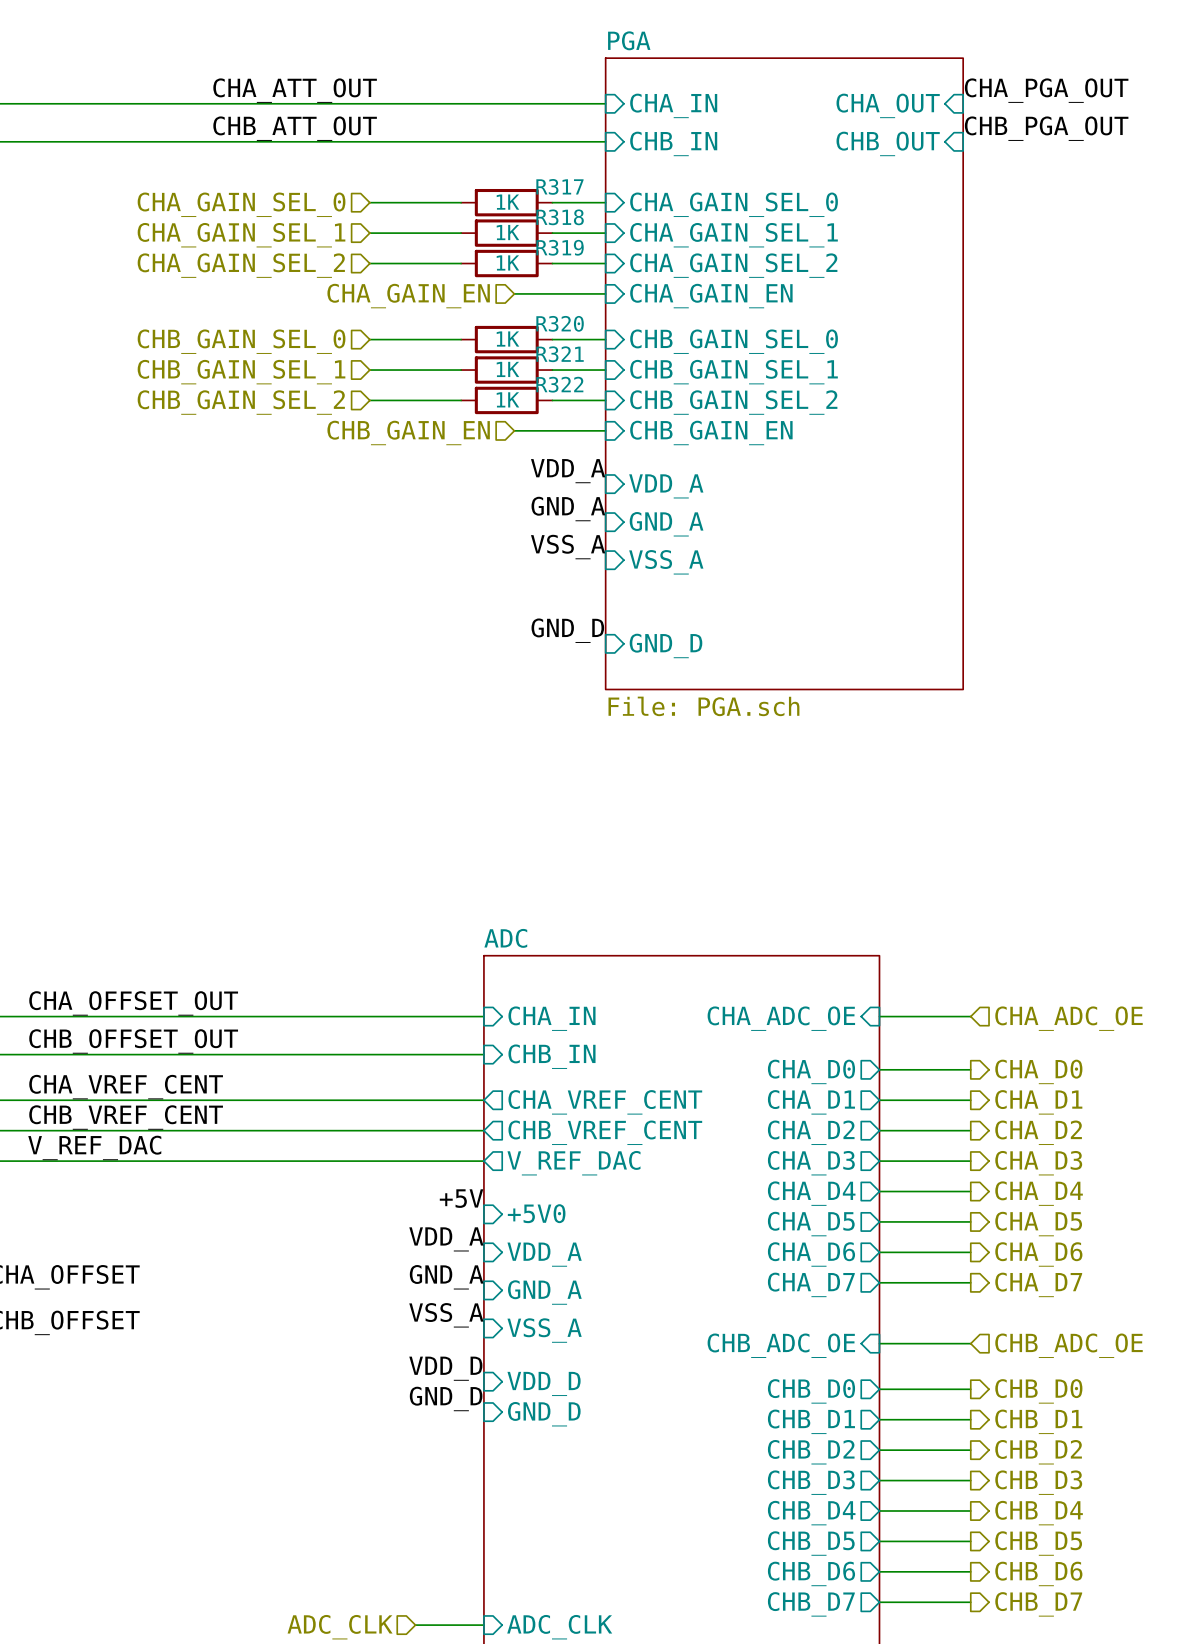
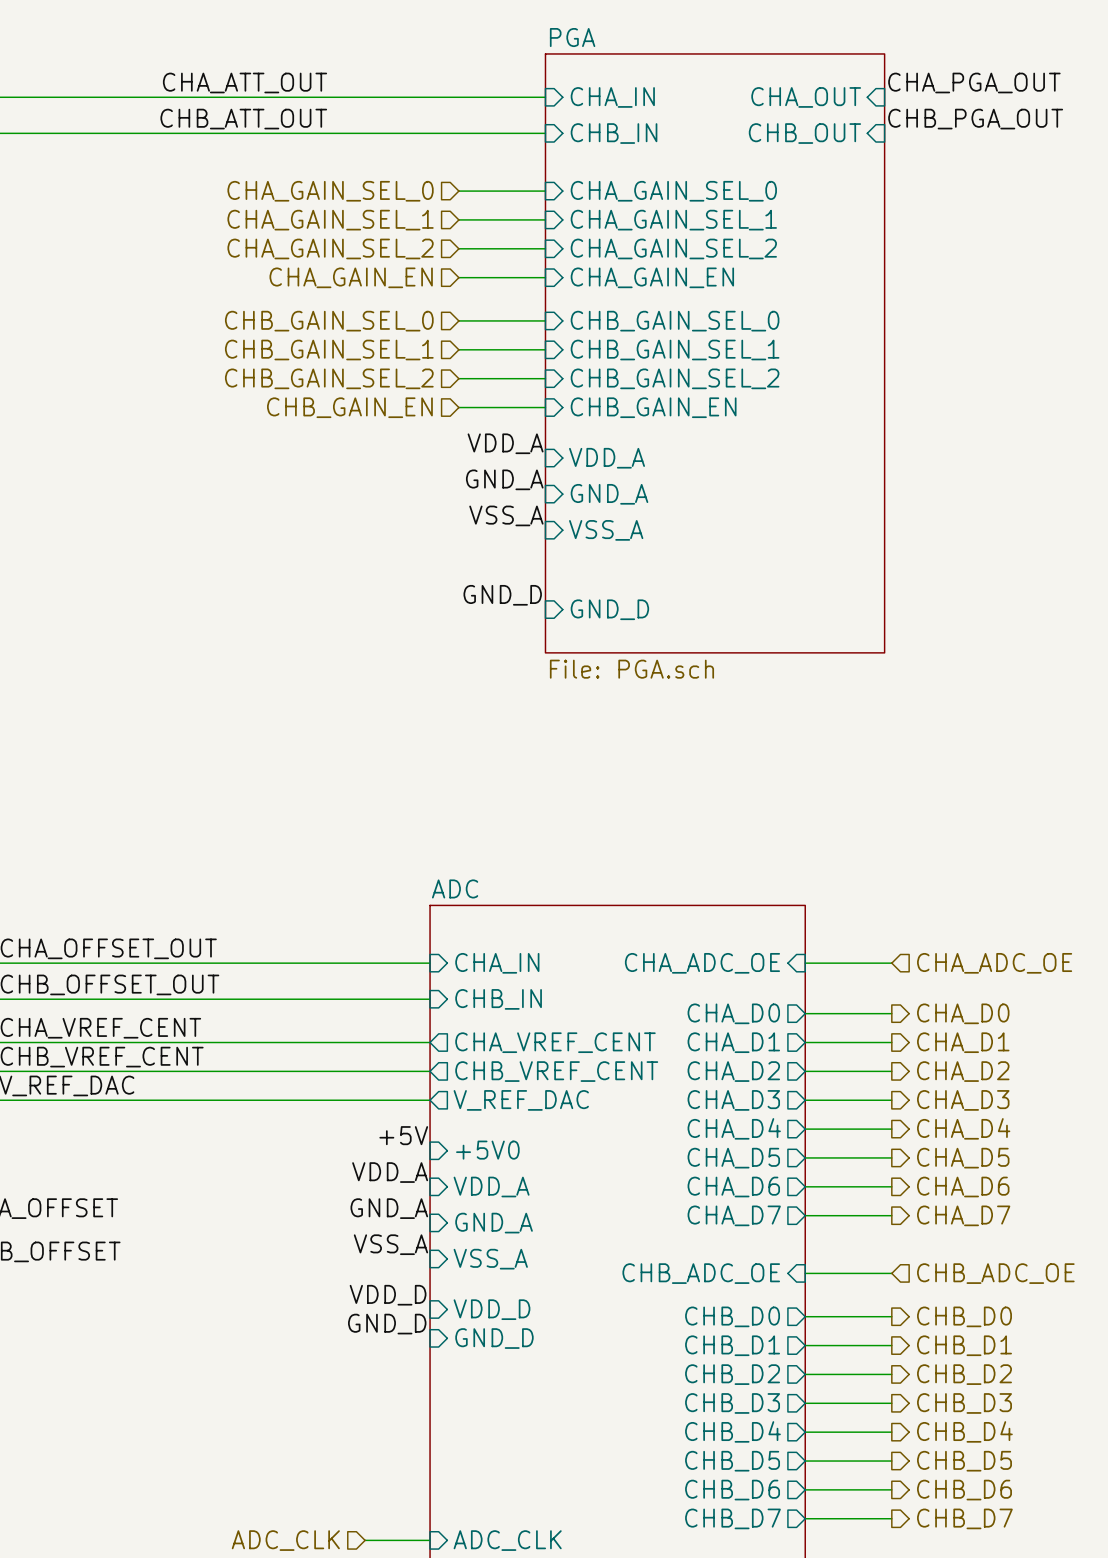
wire: (369, 202) (461, 202) -> none
R317: 1K (506, 202) -> none
wire: none -> (458, 191) (494, 191)
hierarchical label position: CHA_GAIN_SEL_0 (241, 204) -> CHA_GAIN_SEL_0 (330, 191)
wire: (369, 233) (461, 233) -> none
R318: 1K (506, 233) -> none
wire: none -> (458, 219) (494, 219)
hierarchical label position: CHA_GAIN_SEL_1 (241, 235) -> CHA_GAIN_SEL_1 (330, 220)
wire: (369, 263) (461, 263) -> none
R319: 1K (506, 263) -> none
wire: none -> (458, 248) (494, 248)
hierarchical label position: CHA_GAIN_SEL_2 (241, 265) -> CHA_GAIN_SEL_2 (330, 248)
wire: (369, 339) (461, 339) -> none
R320: 1K (506, 339) -> none
wire: none -> (458, 320) (494, 320)
hierarchical label position: CHB_GAIN_SEL_0 (241, 341) -> CHB_GAIN_SEL_0 (329, 321)
wire: (369, 370) (461, 370) -> none
R321: 1K (506, 370) -> none
wire: none -> (458, 349) (494, 349)
hierarchical label position: CHB_GAIN_SEL_1 (241, 372) -> CHB_GAIN_SEL_1 (329, 349)
wire: (369, 400) (461, 400) -> none
R322: 1K (506, 400) -> none
wire: none -> (458, 378) (494, 378)
hierarchical label position: CHB_GAIN_SEL_2 (241, 402) -> CHB_GAIN_SEL_2 (329, 378)

